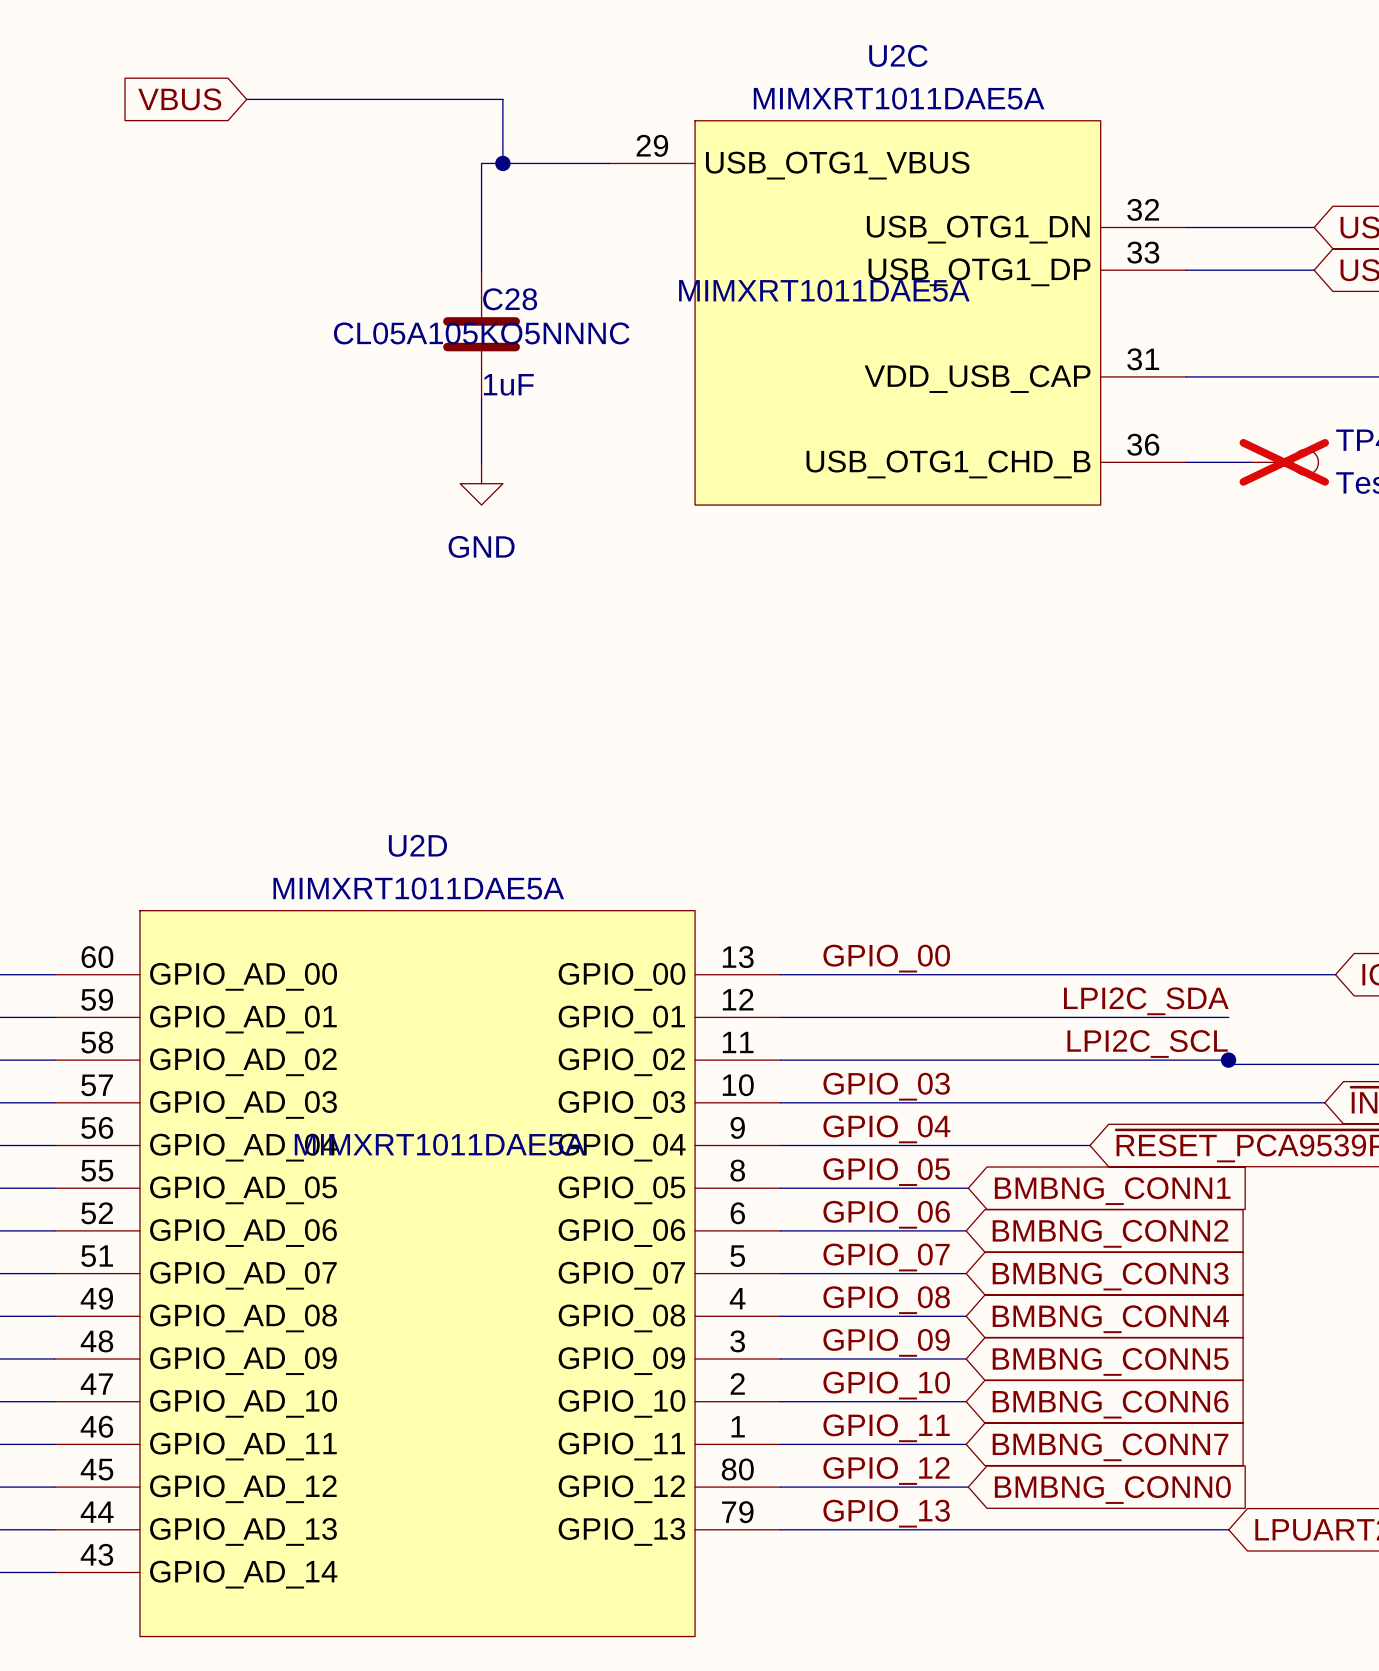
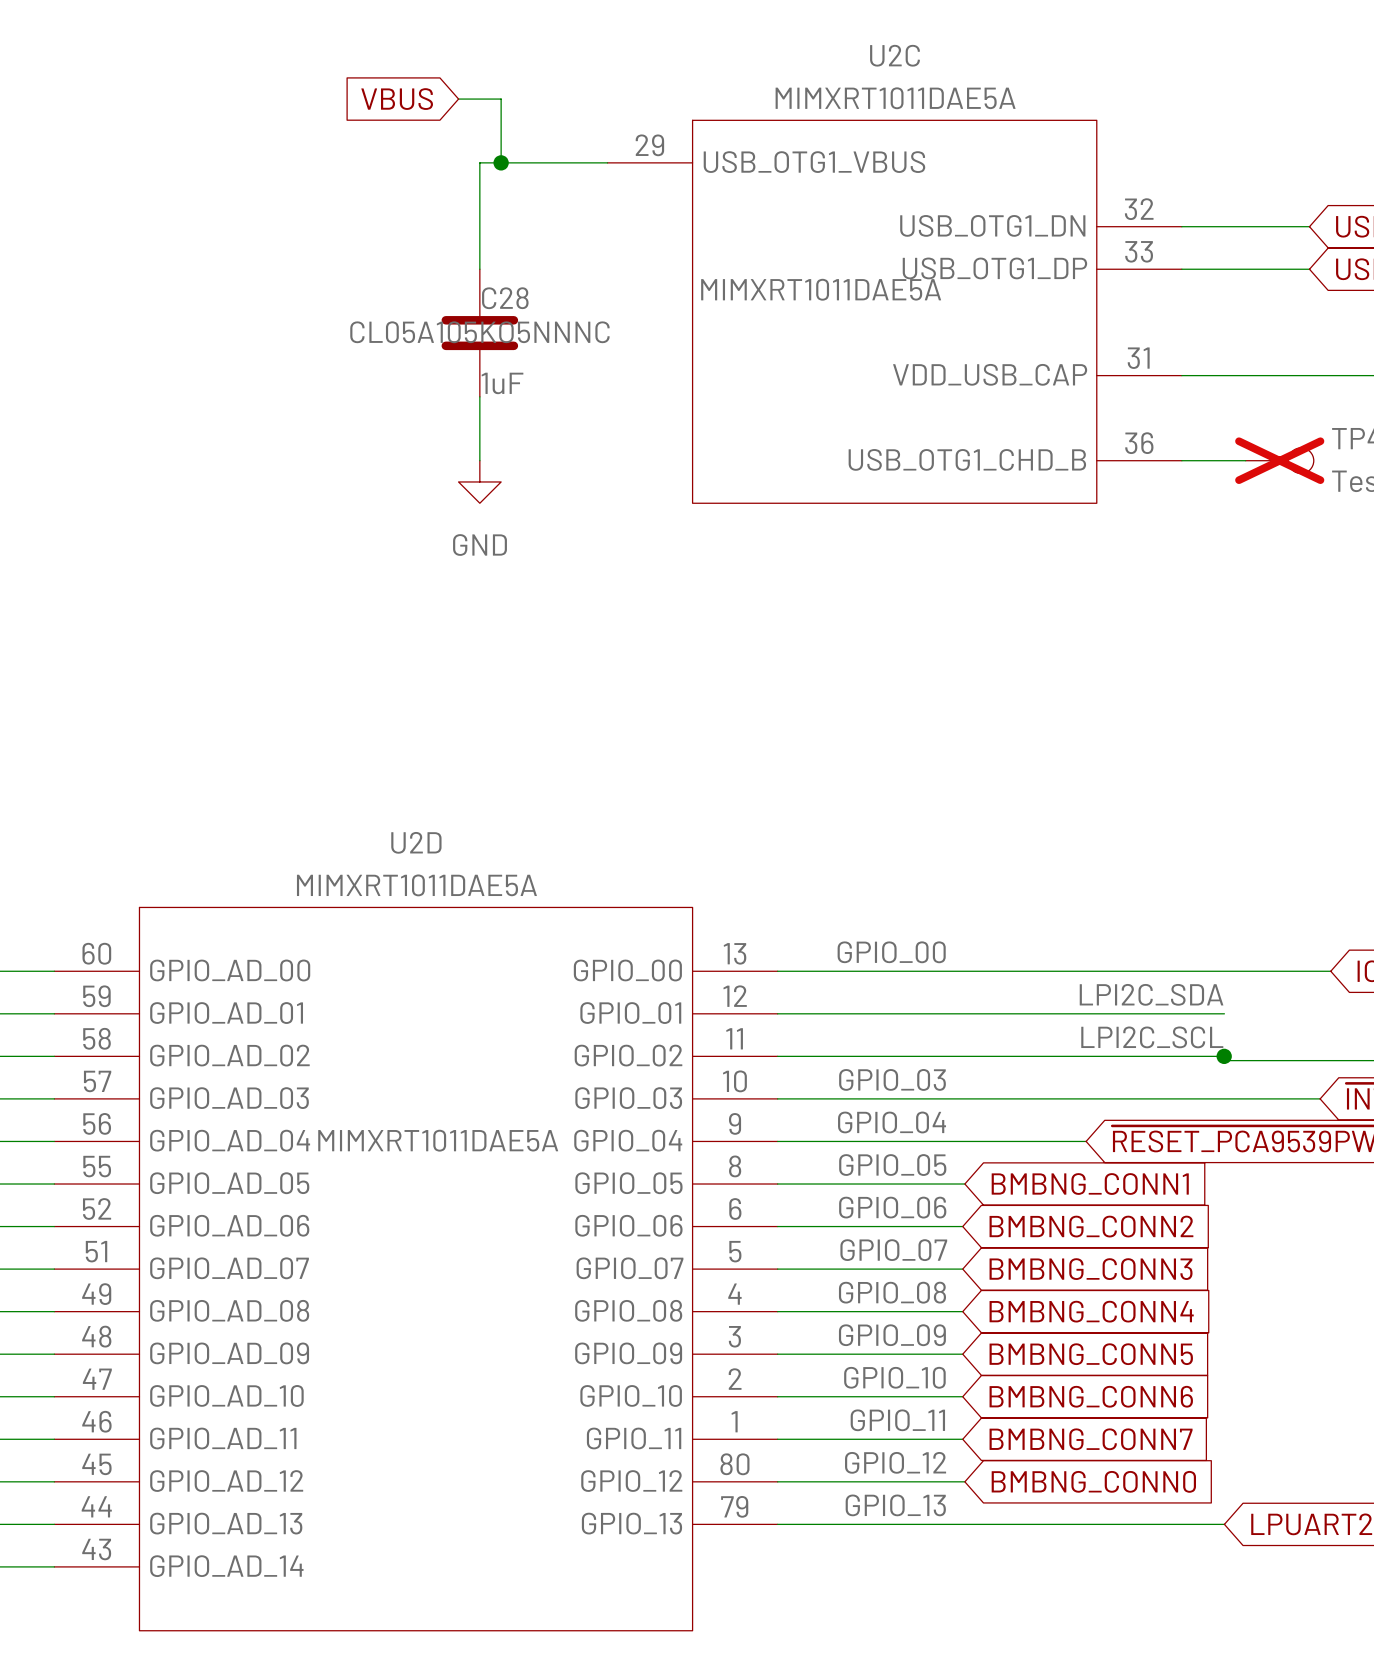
global label position: VBUS (179, 99) -> VBUS (397, 99)
wire: (246, 99) (460, 99) -> none

